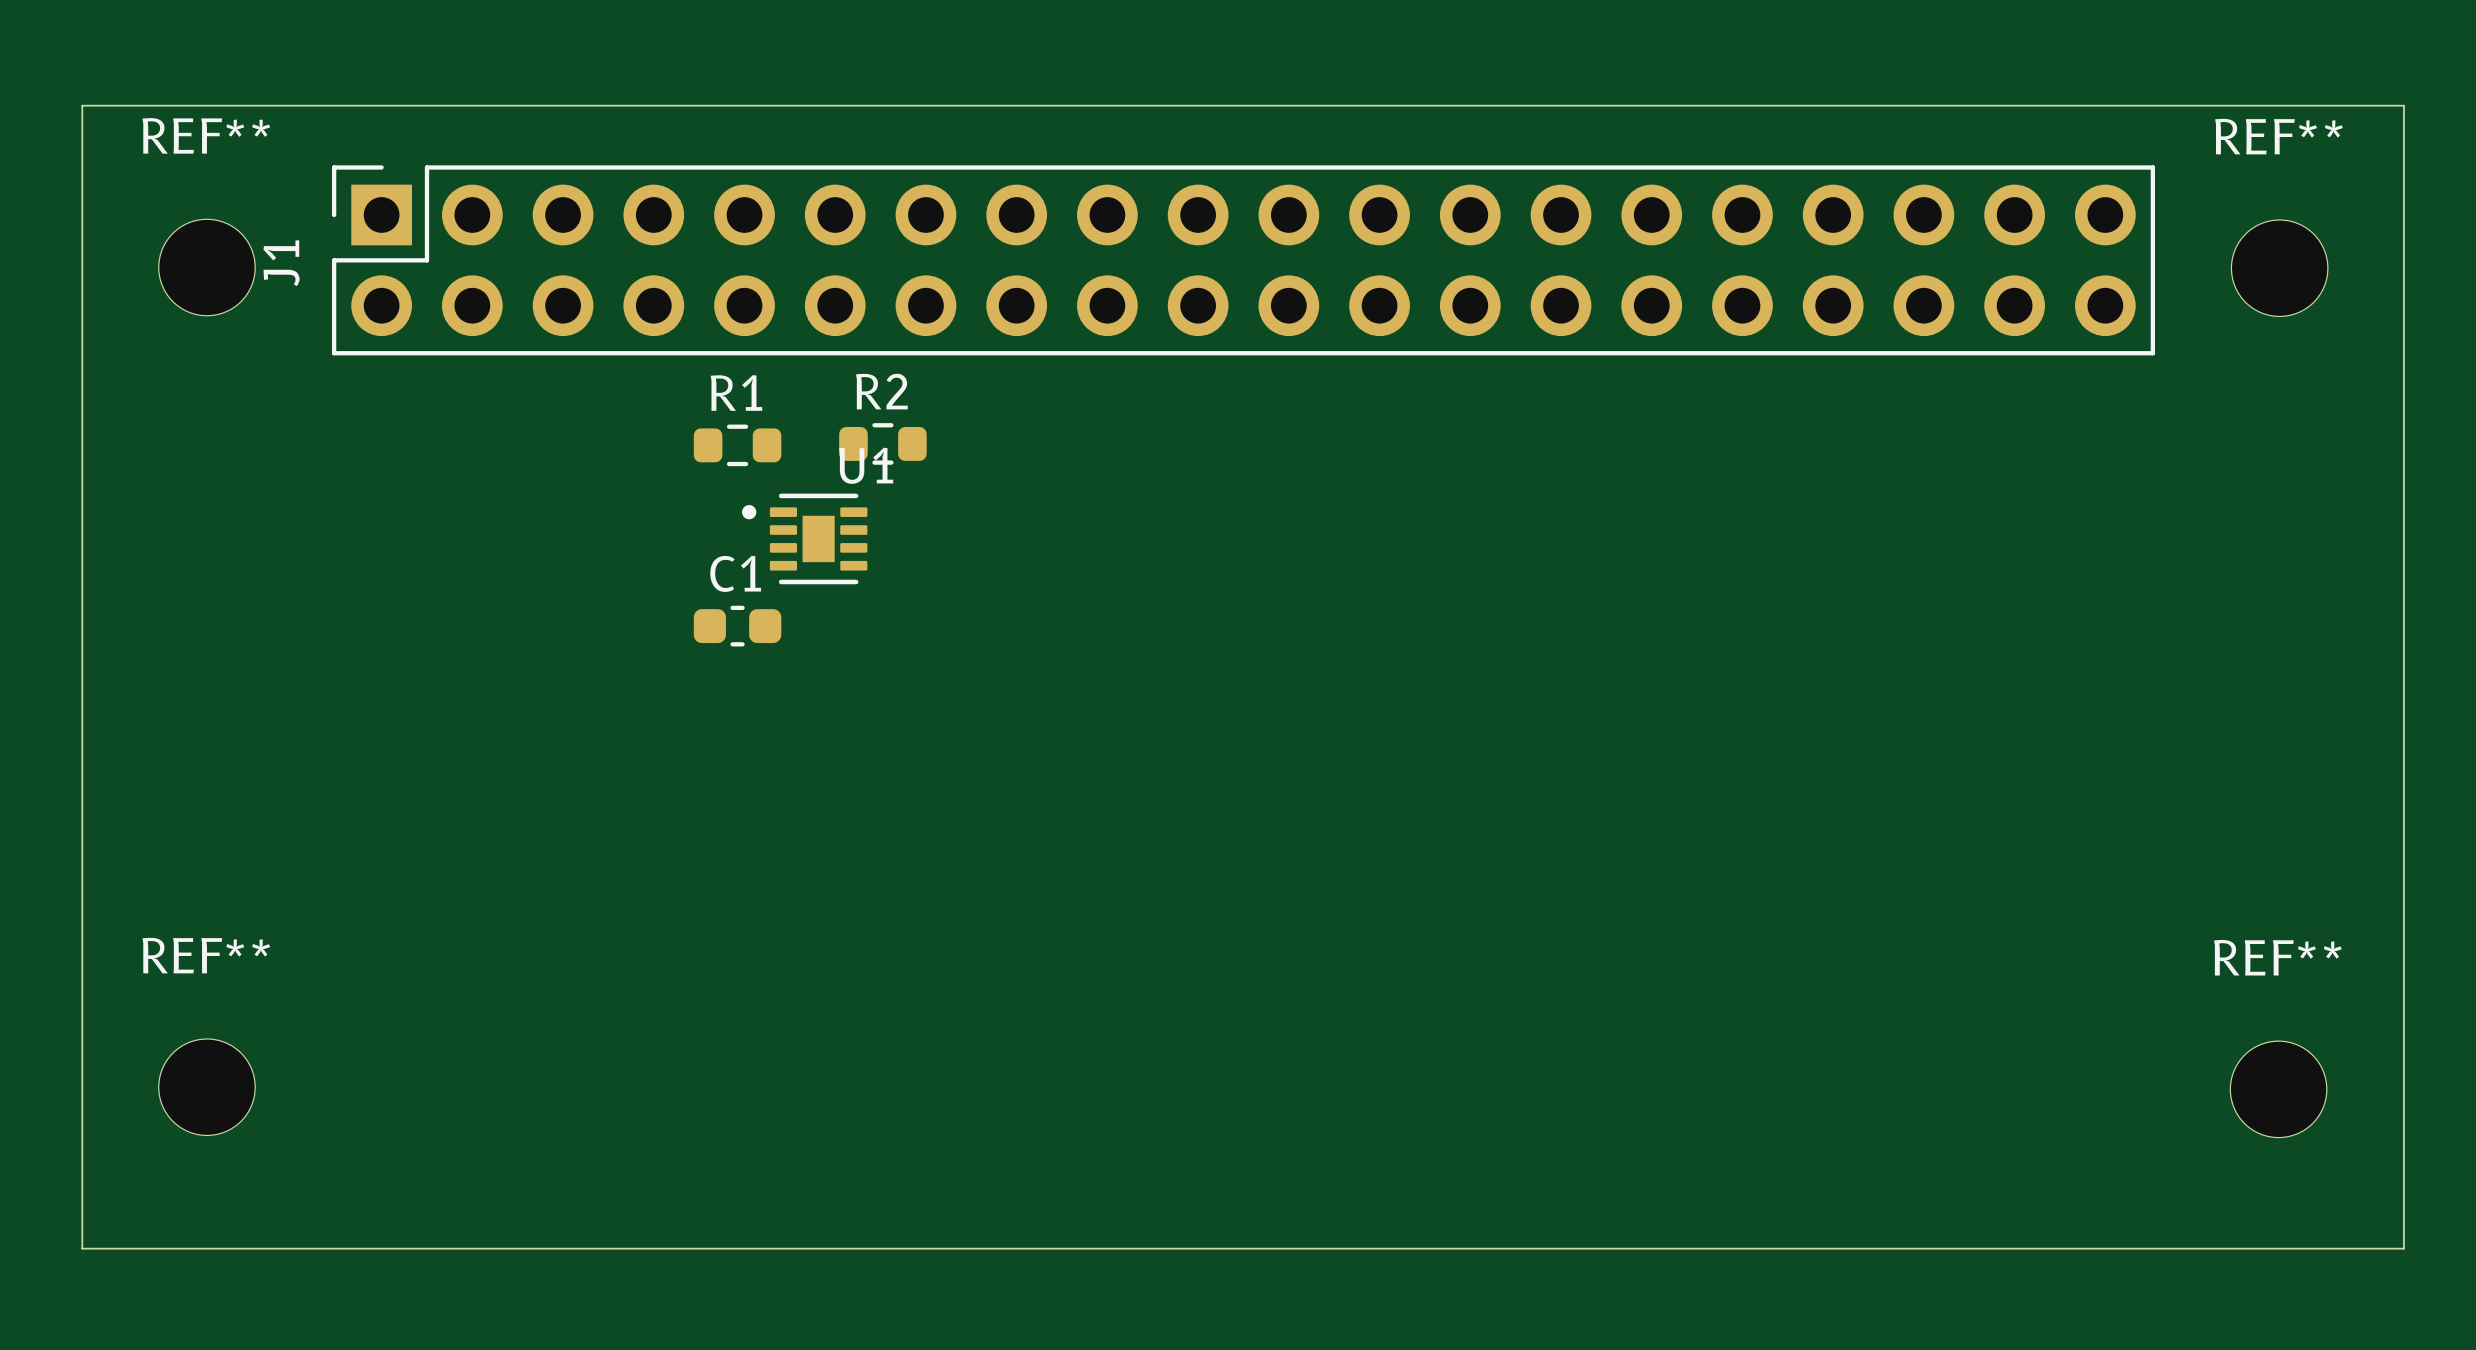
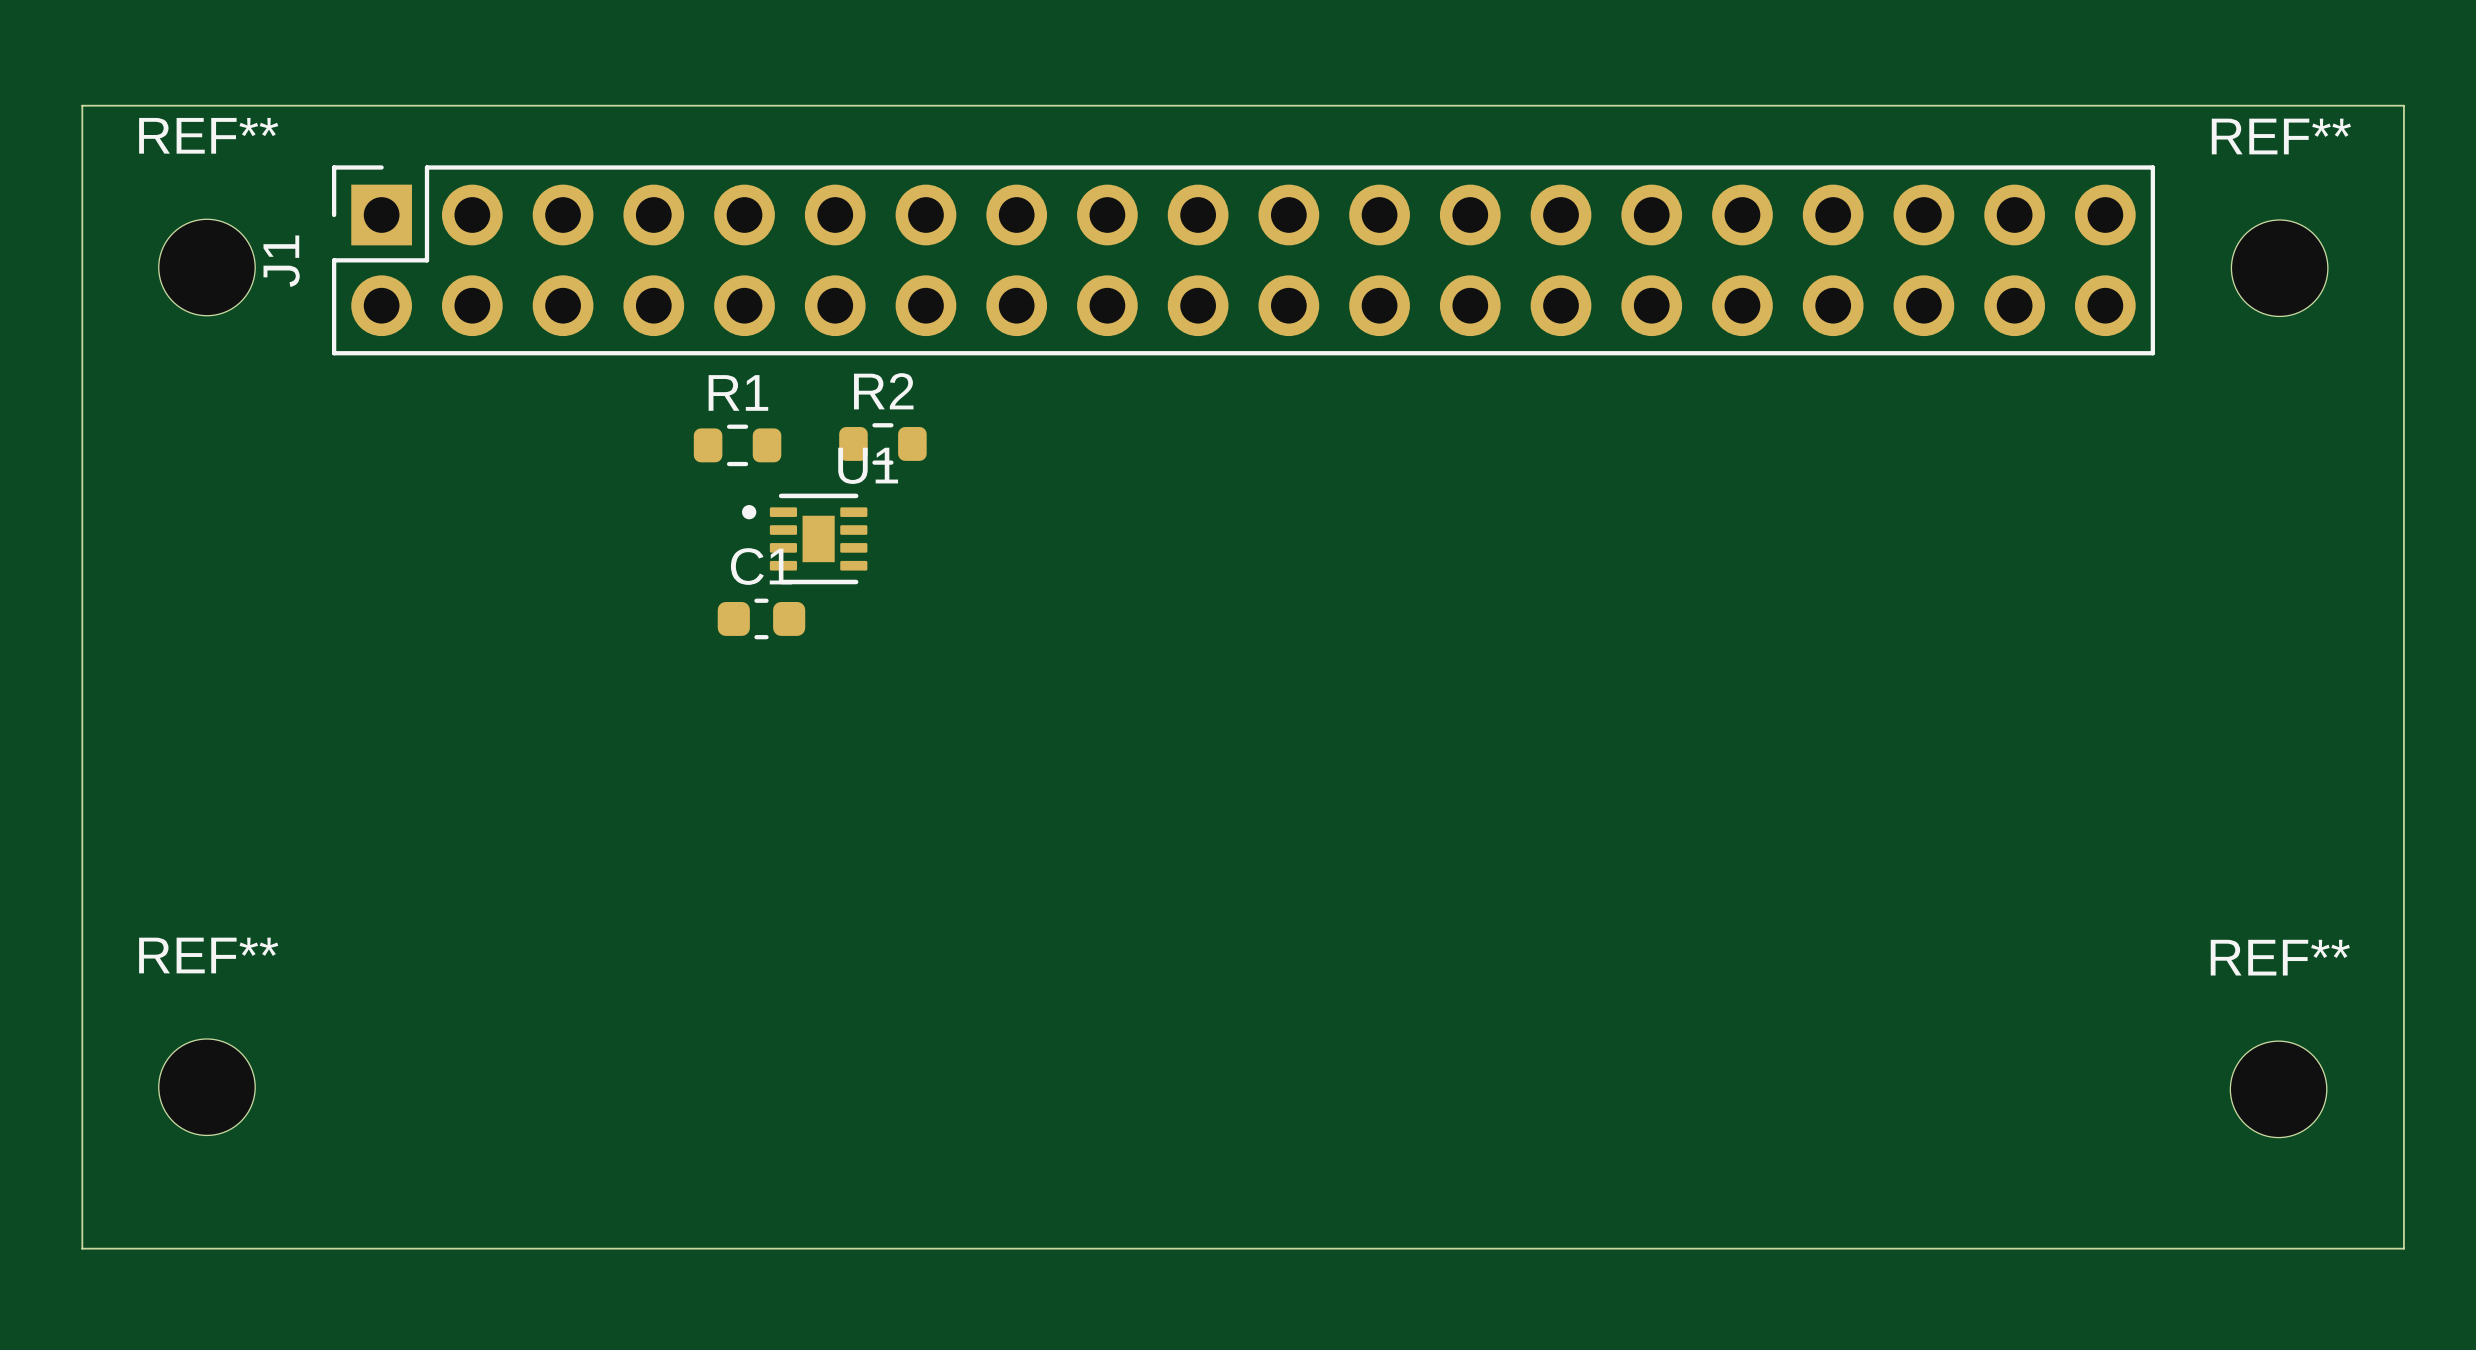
C1 position: (737, 626) -> (761, 618)

